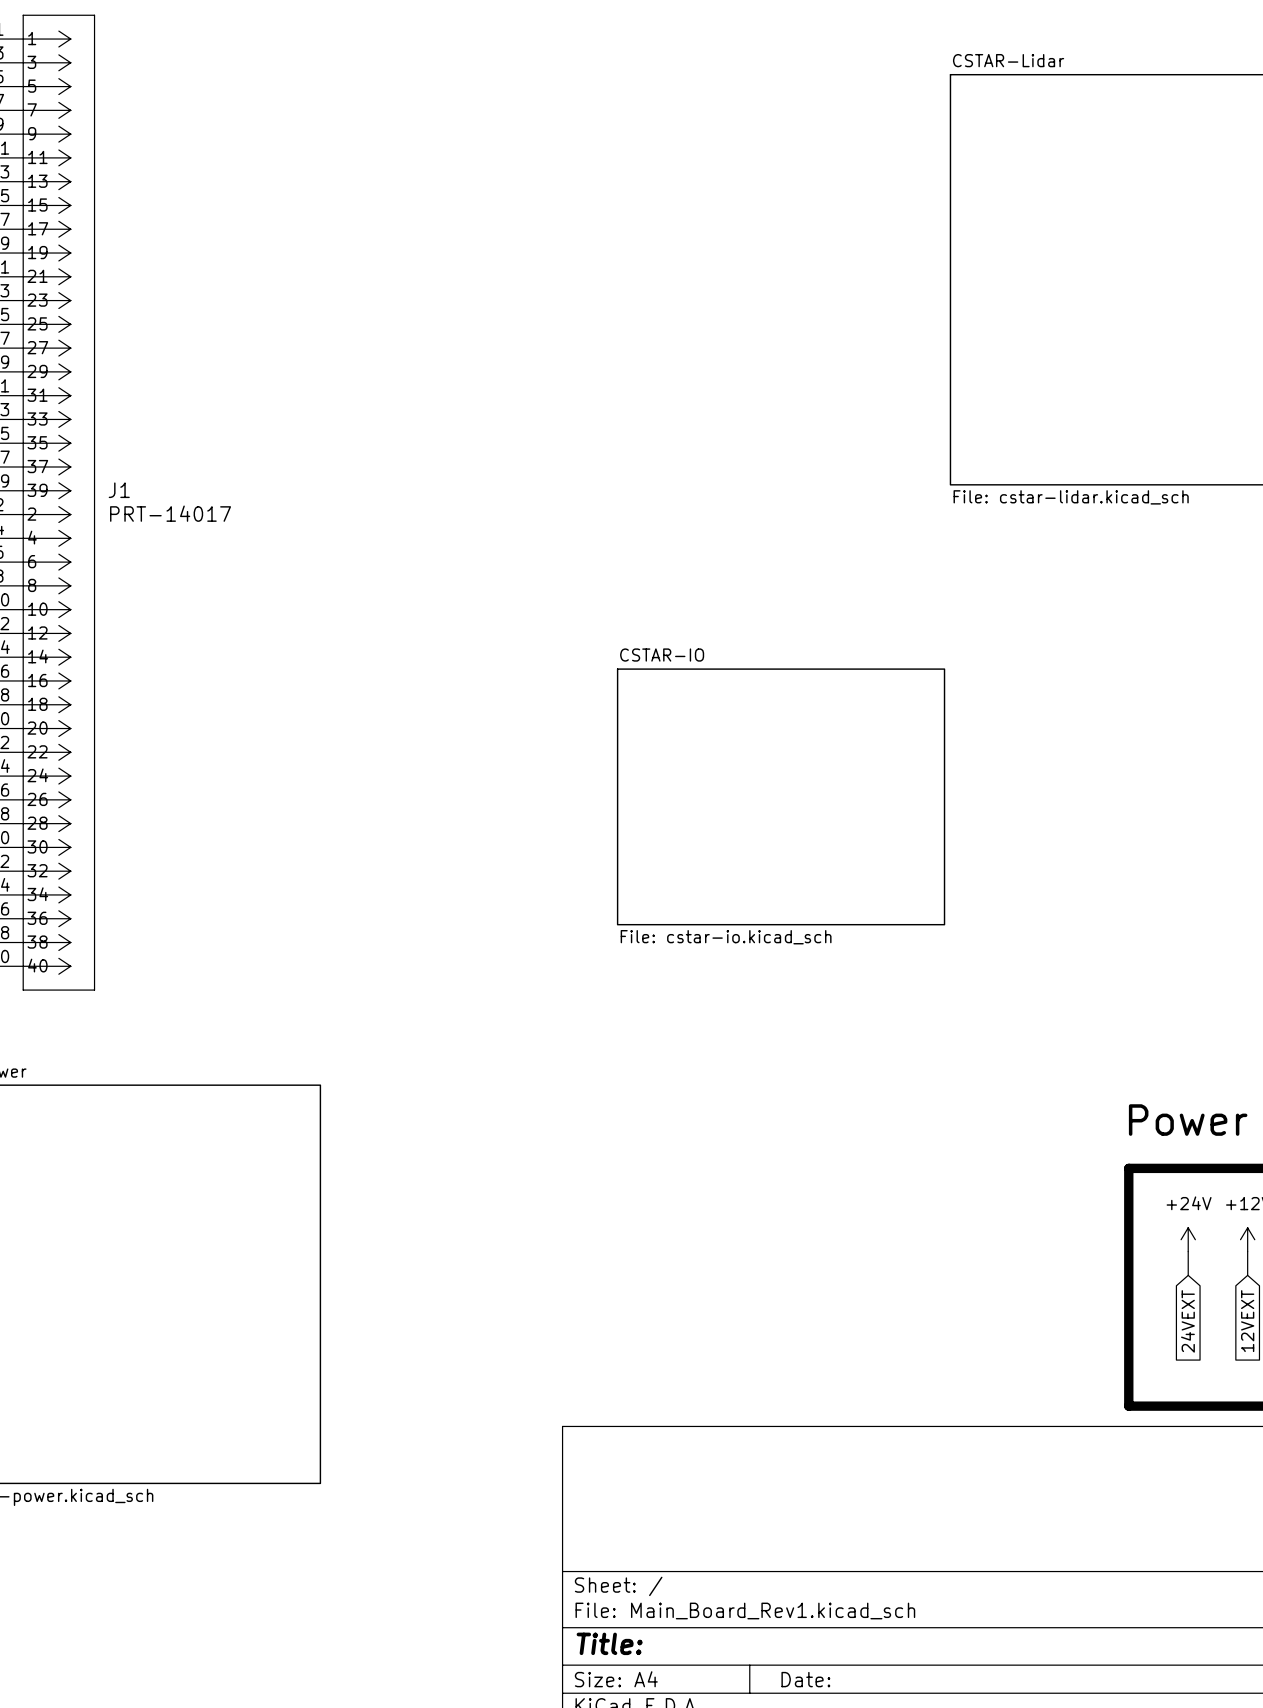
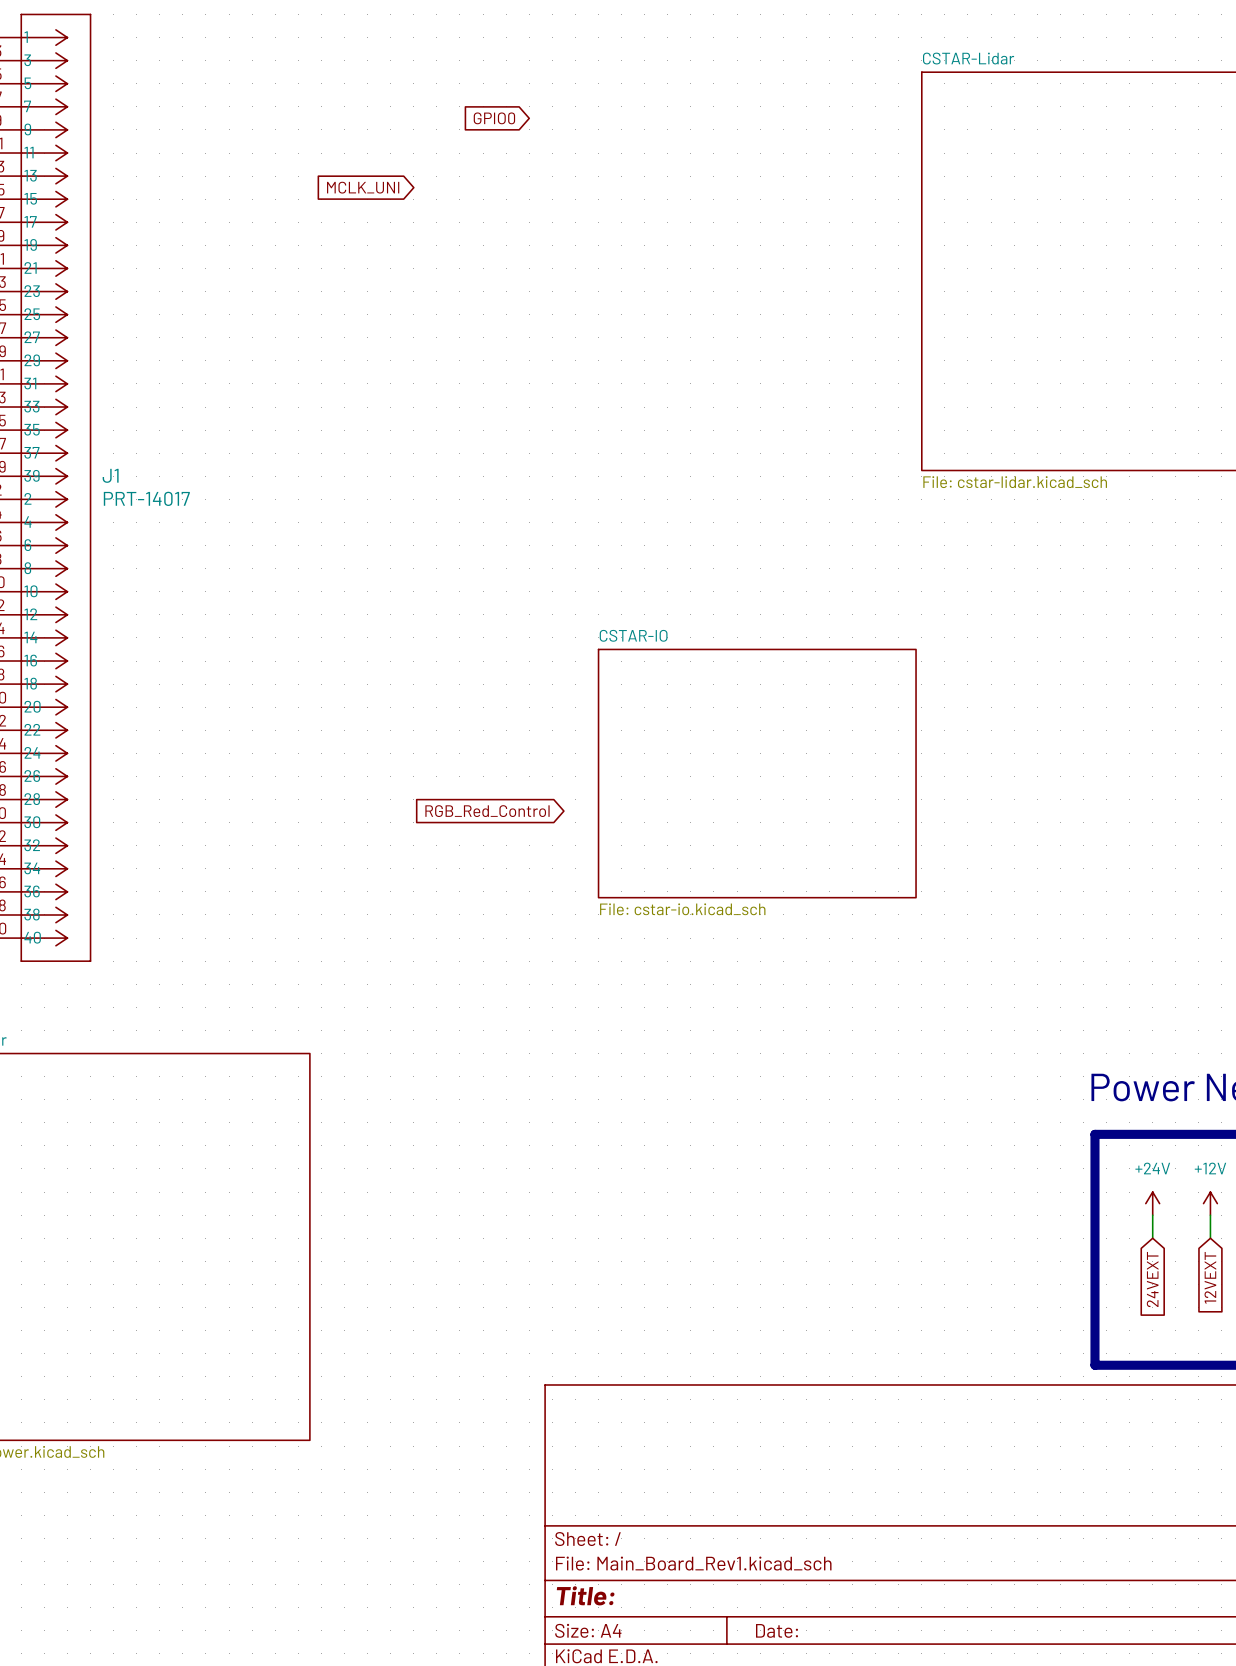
global label: none -> GPIO0 (494, 118)
global label: none -> MCLK_UNI (363, 187)
global label: none -> RGB_Red_Control (487, 811)

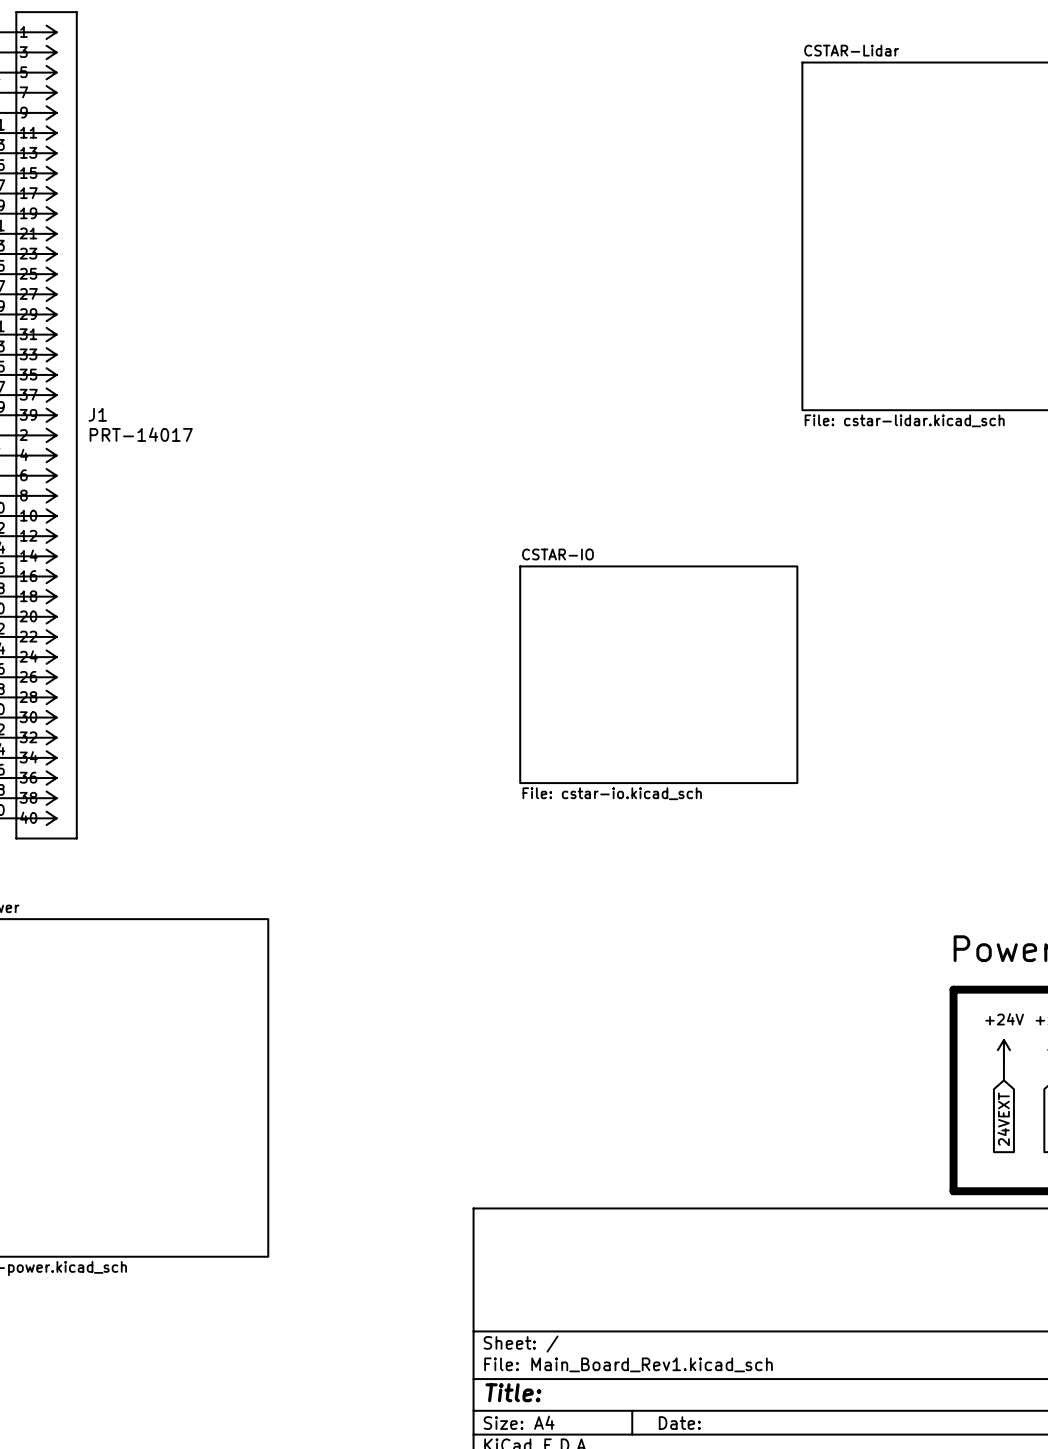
global label: GPIO0 (494, 118) -> none
global label: MCLK_UNI (363, 187) -> none
global label: RGB_Red_Control (487, 811) -> none

